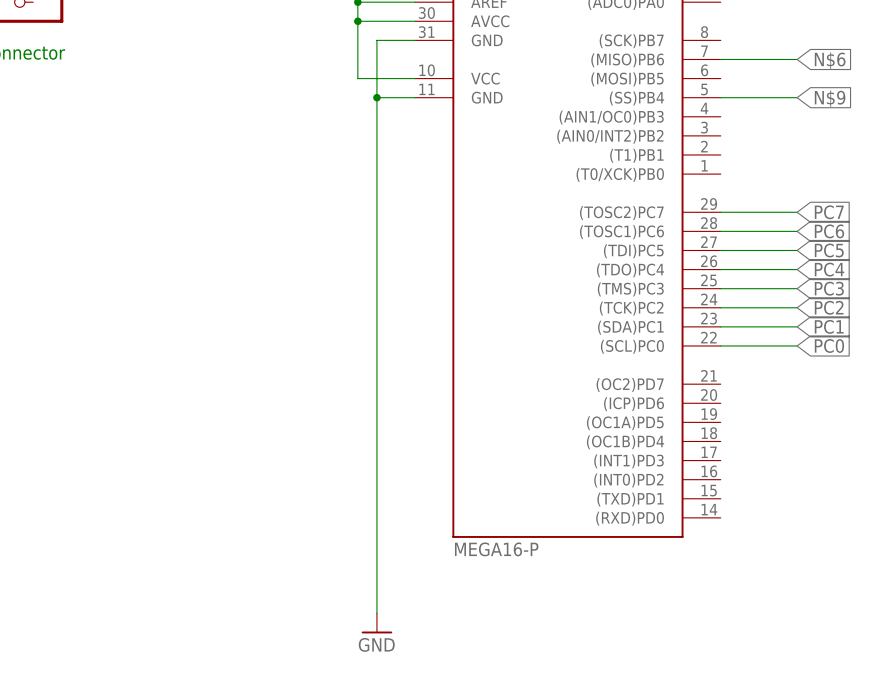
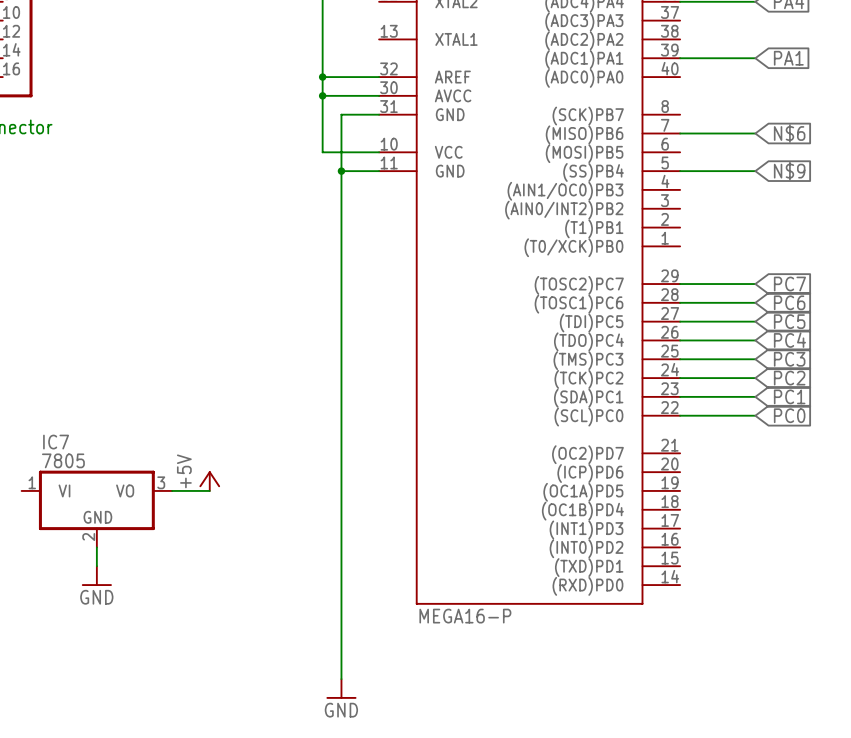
power symbol: none -> +5V (209, 481)
wire: none -> (172, 490) (209, 490)
IC7: none -> 7805 (96, 509)
wire: none -> (96, 547) (96, 566)
power symbol: none -> GND (96, 576)

